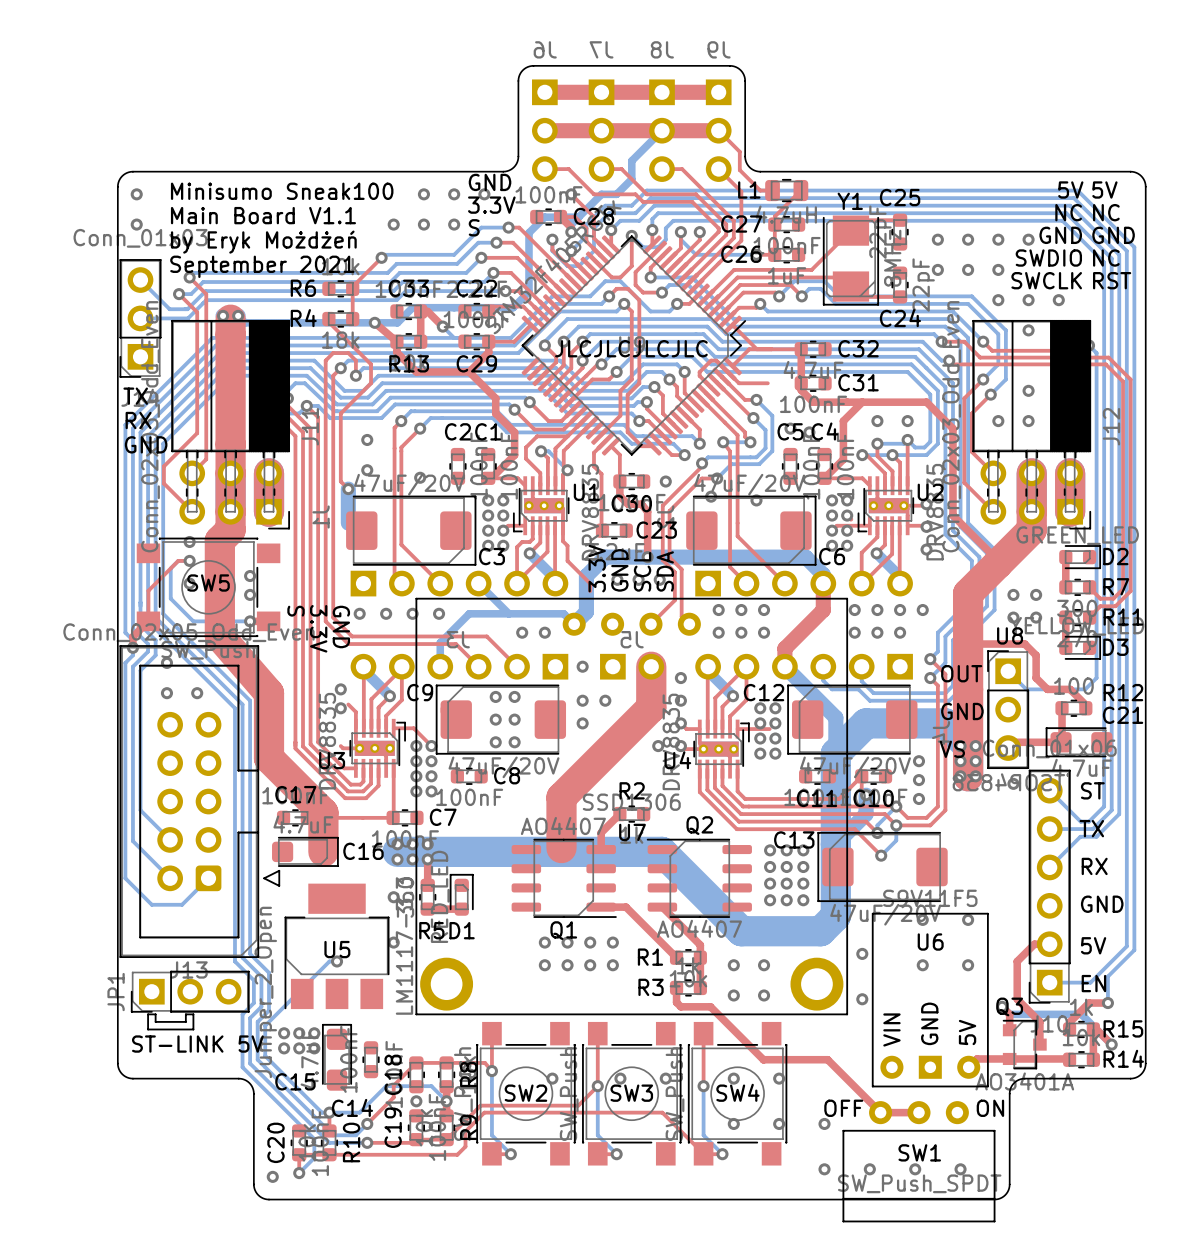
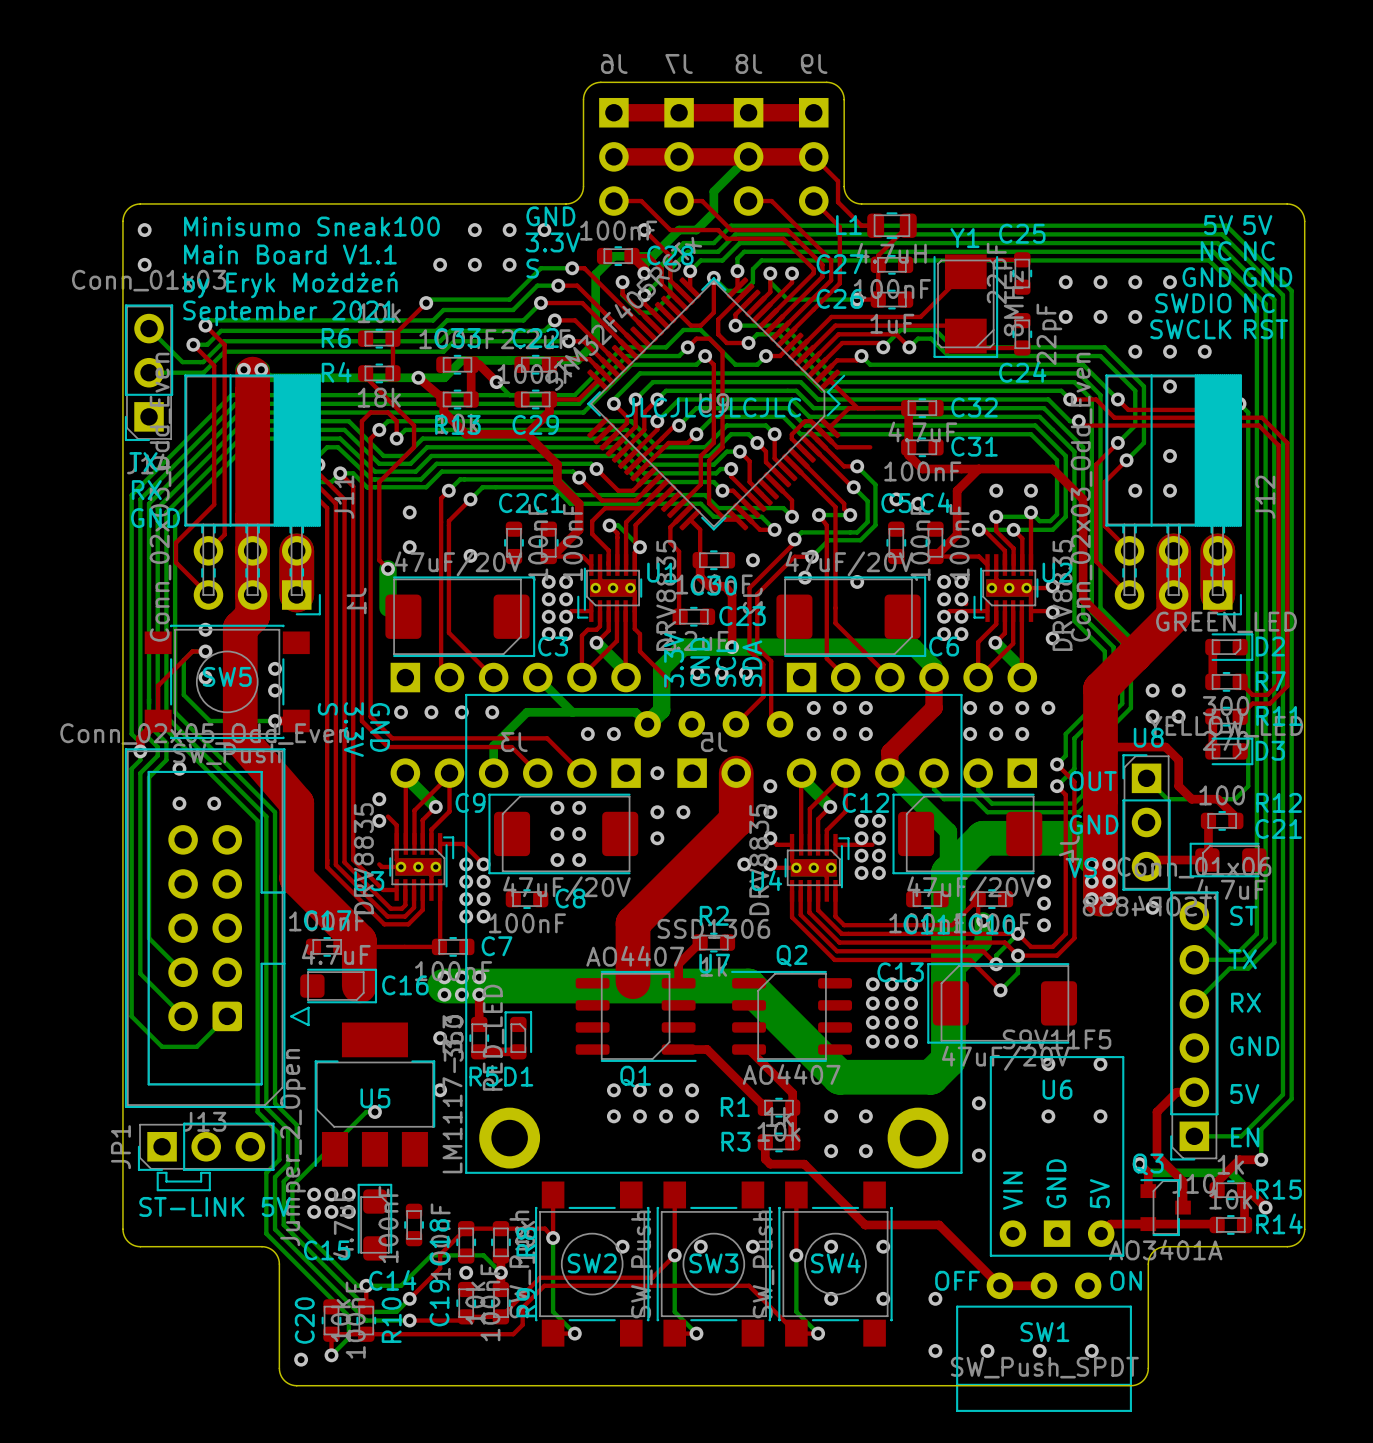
U7 footprint: [415, 597, 849, 1016] -> [465, 693, 963, 1174]

